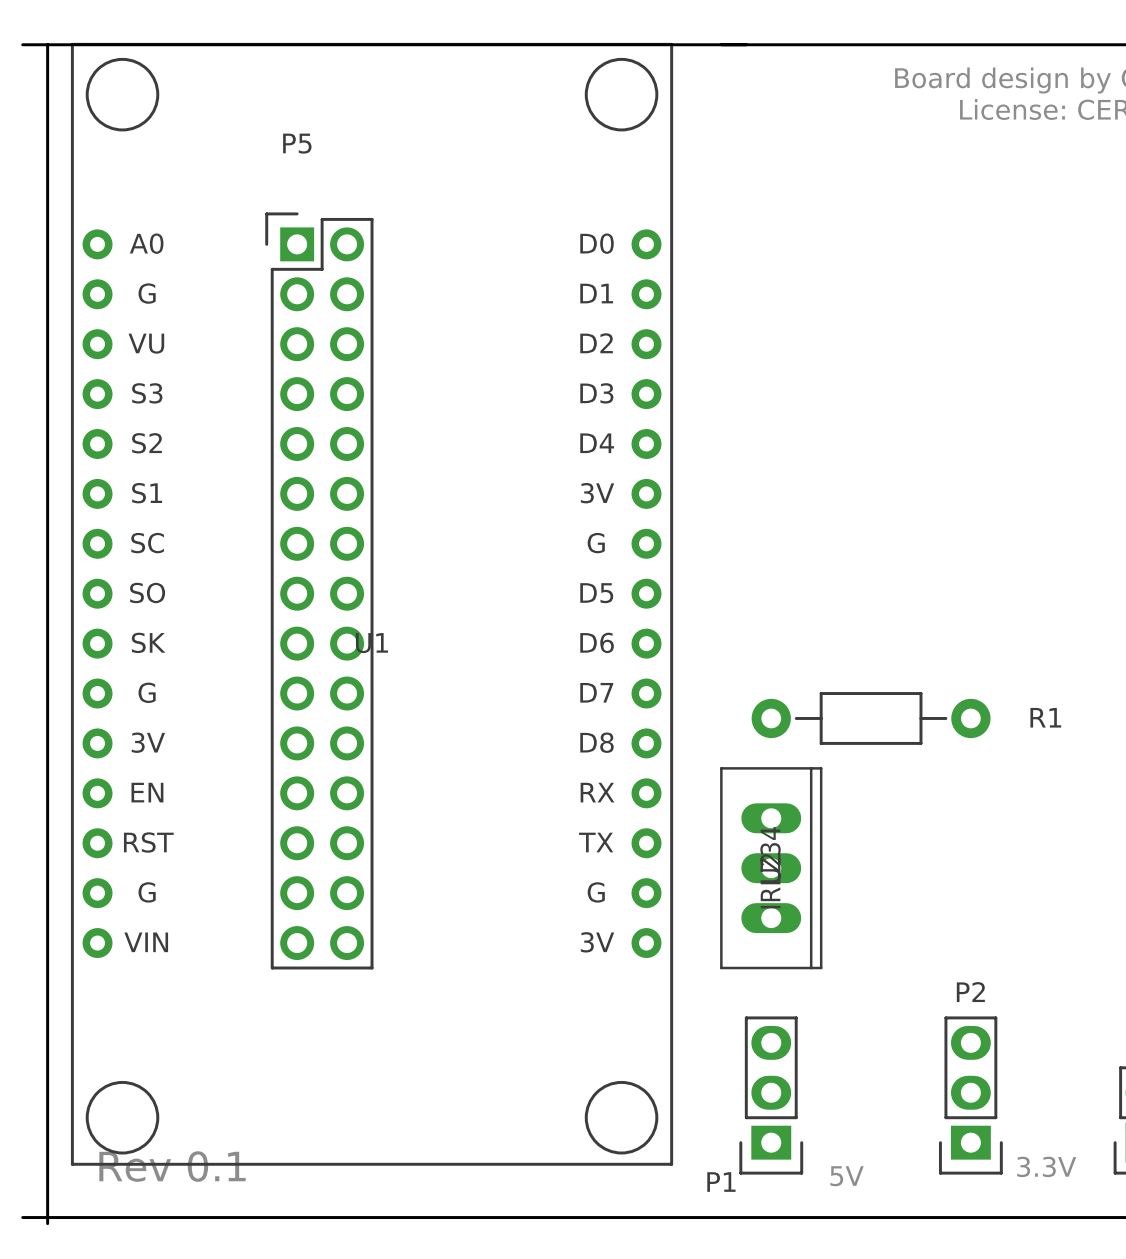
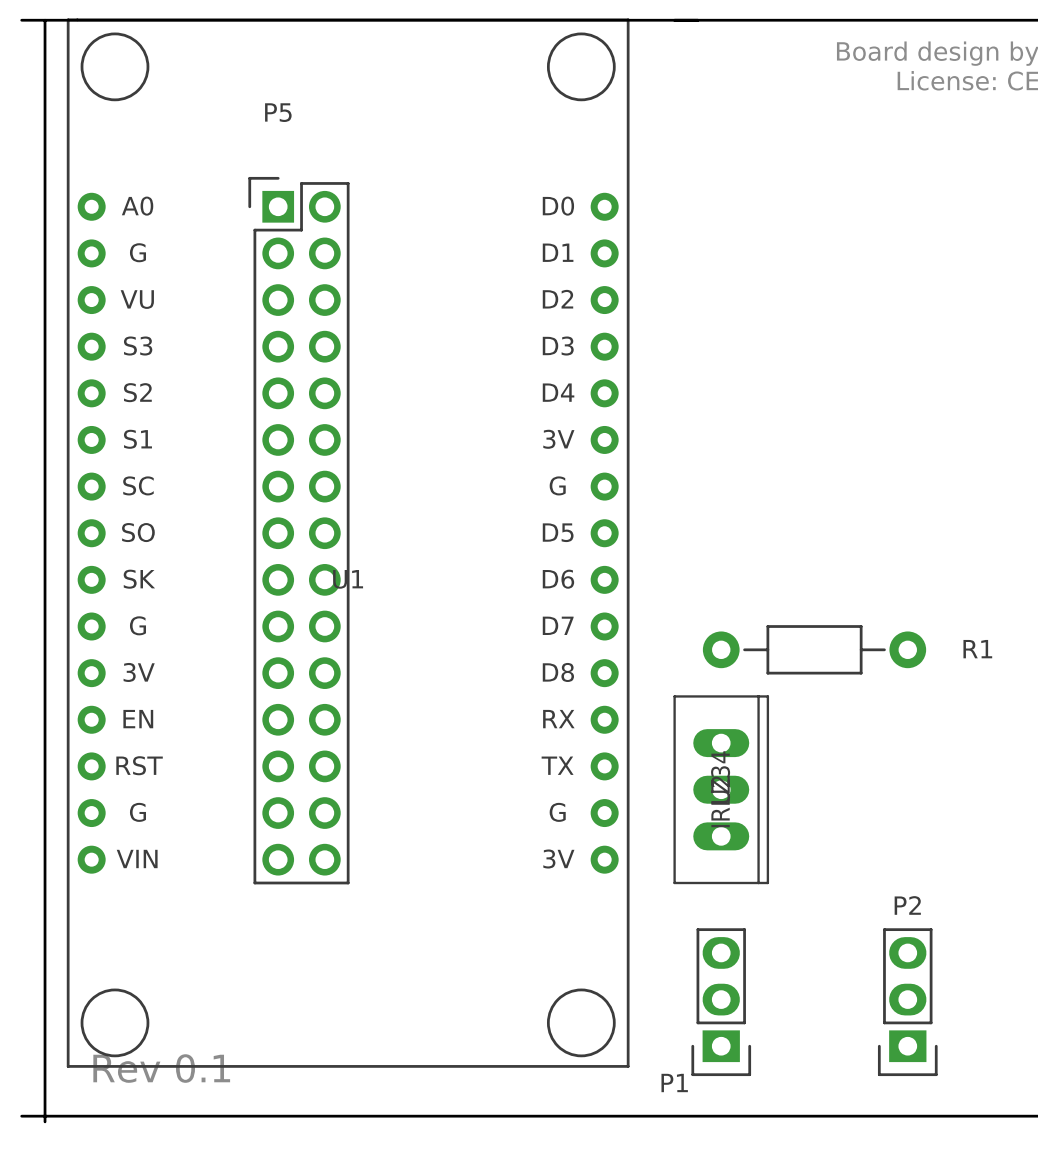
text: 3.3V (1046, 1166) -> none
text: 5V (847, 1176) -> none

